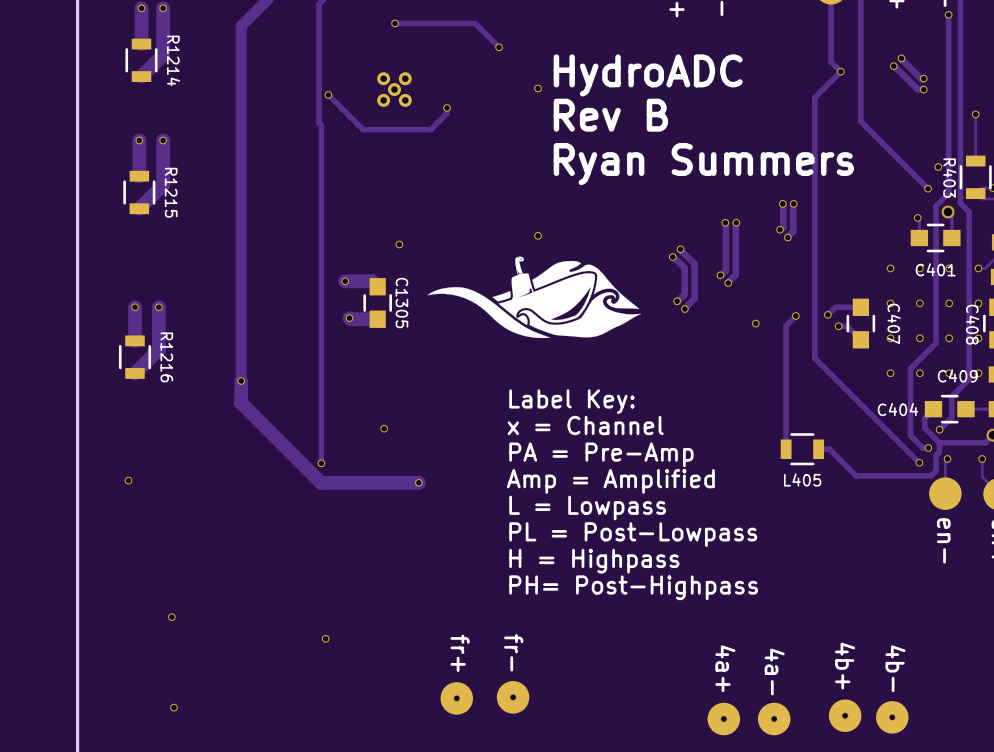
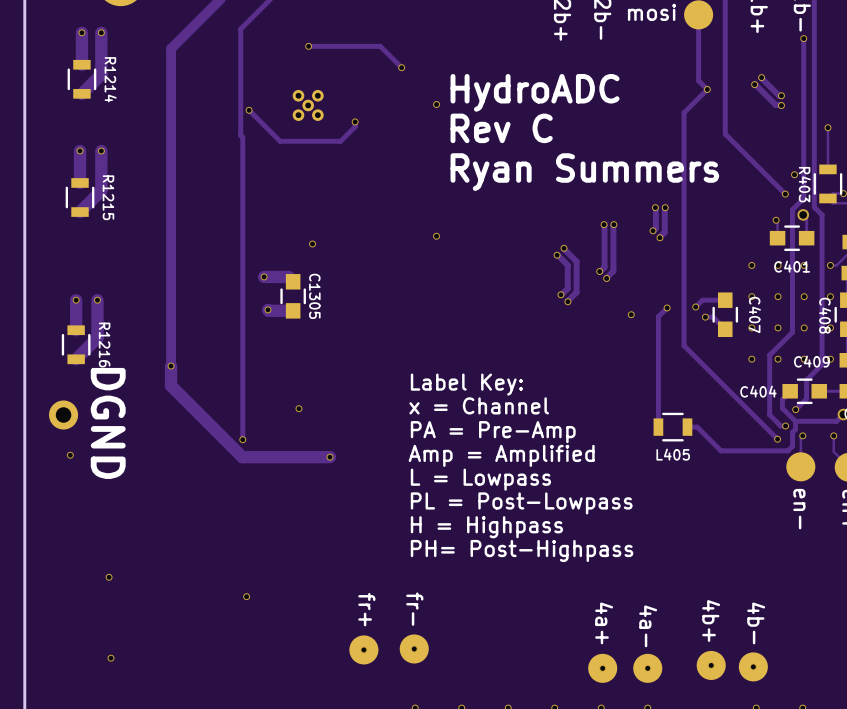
text: Rev B (610, 115) -> Rev C (501, 128)
drawing: [427, 256, 642, 339] -> none
part: none -> (63, 415)
text: none -> DGND (108, 423)

